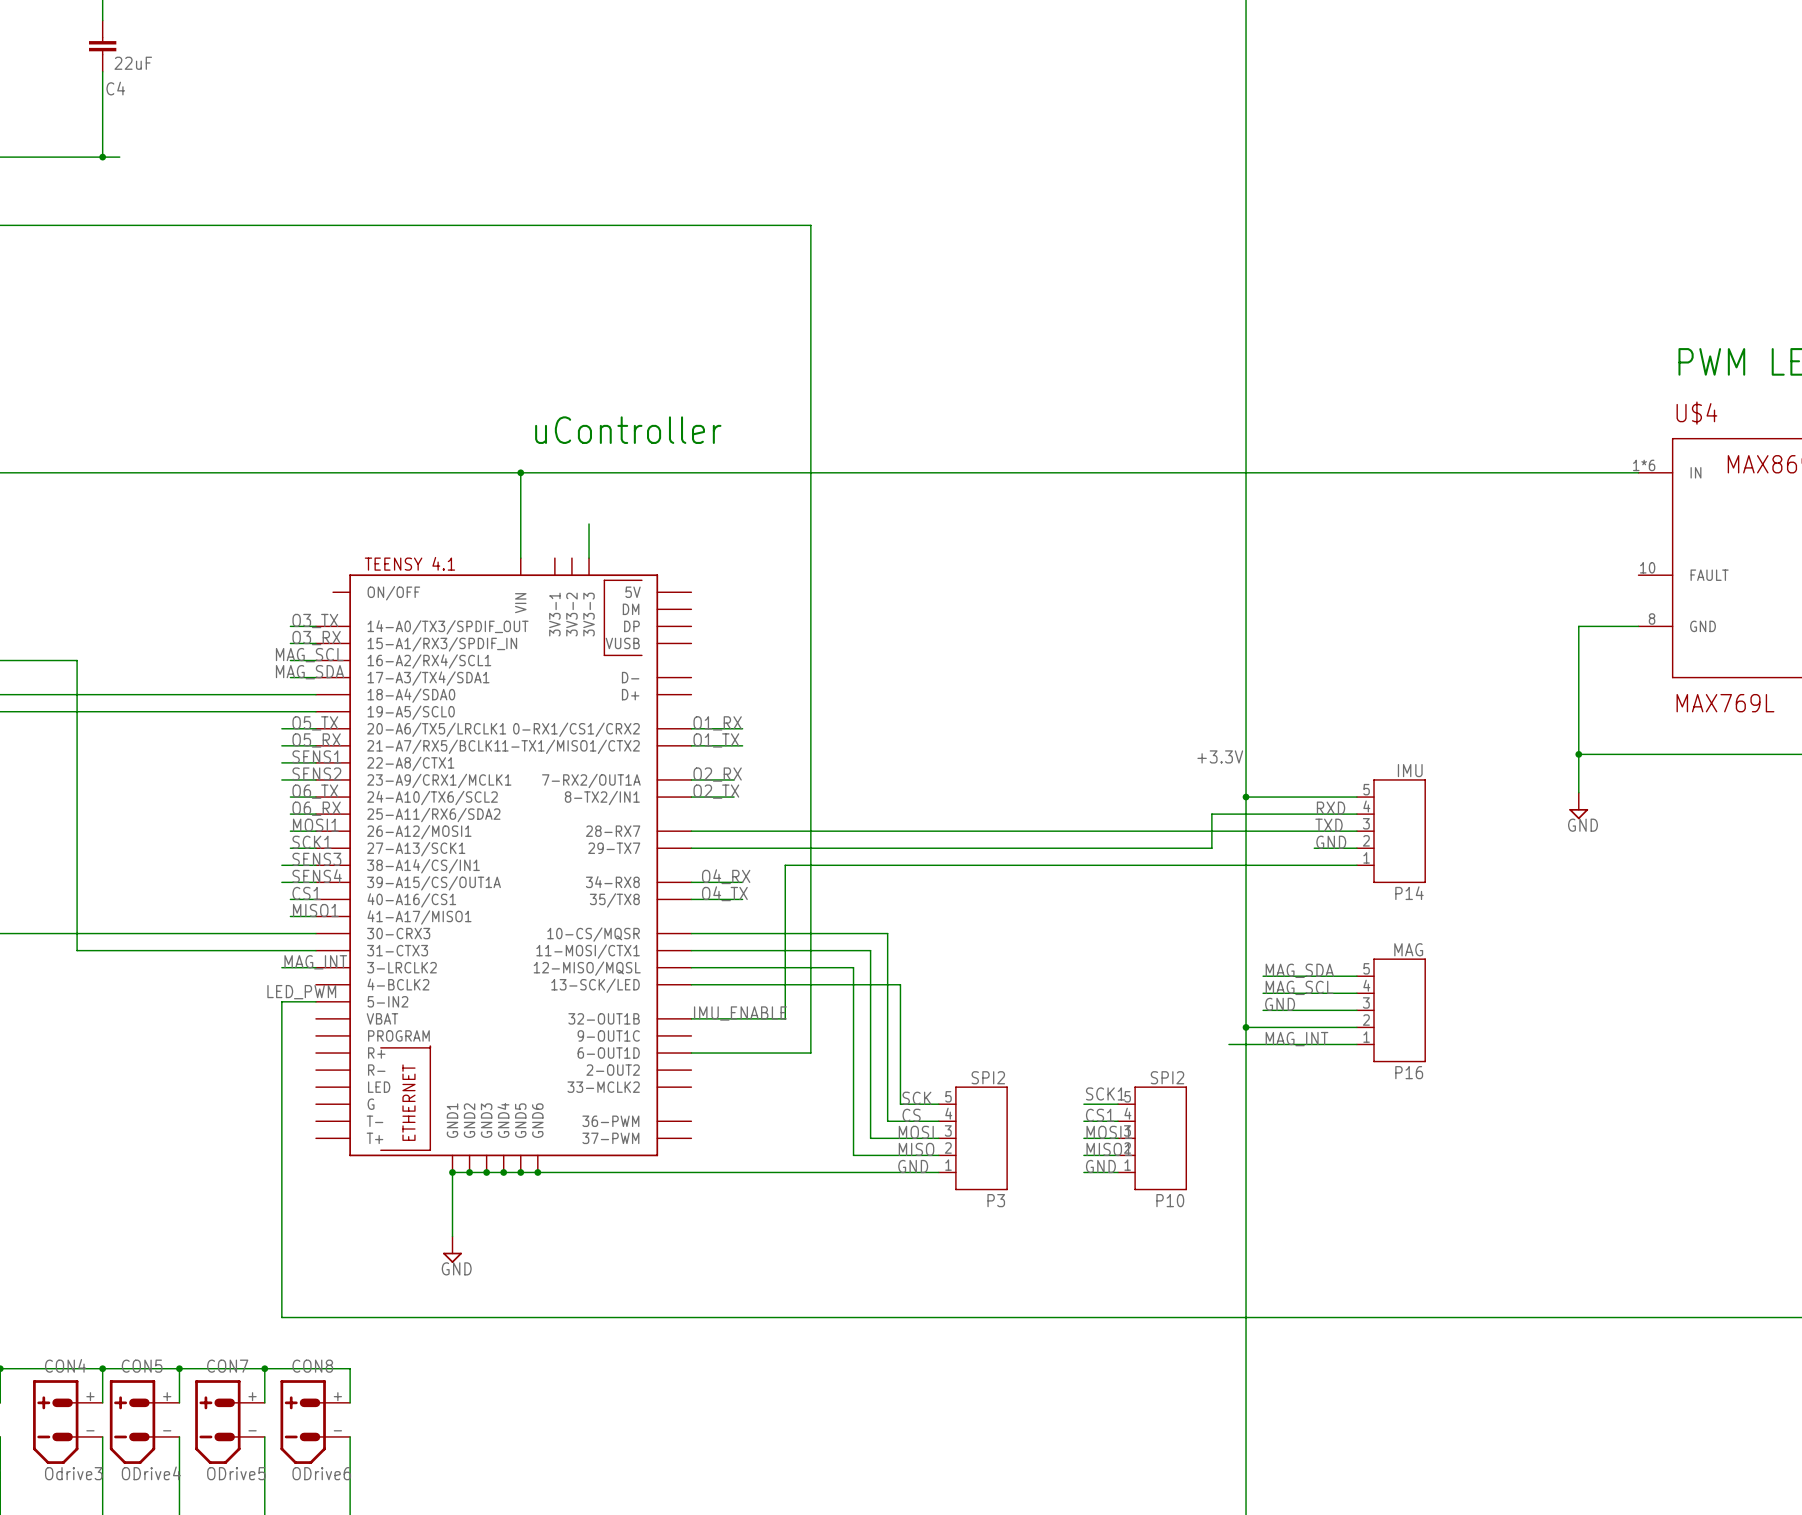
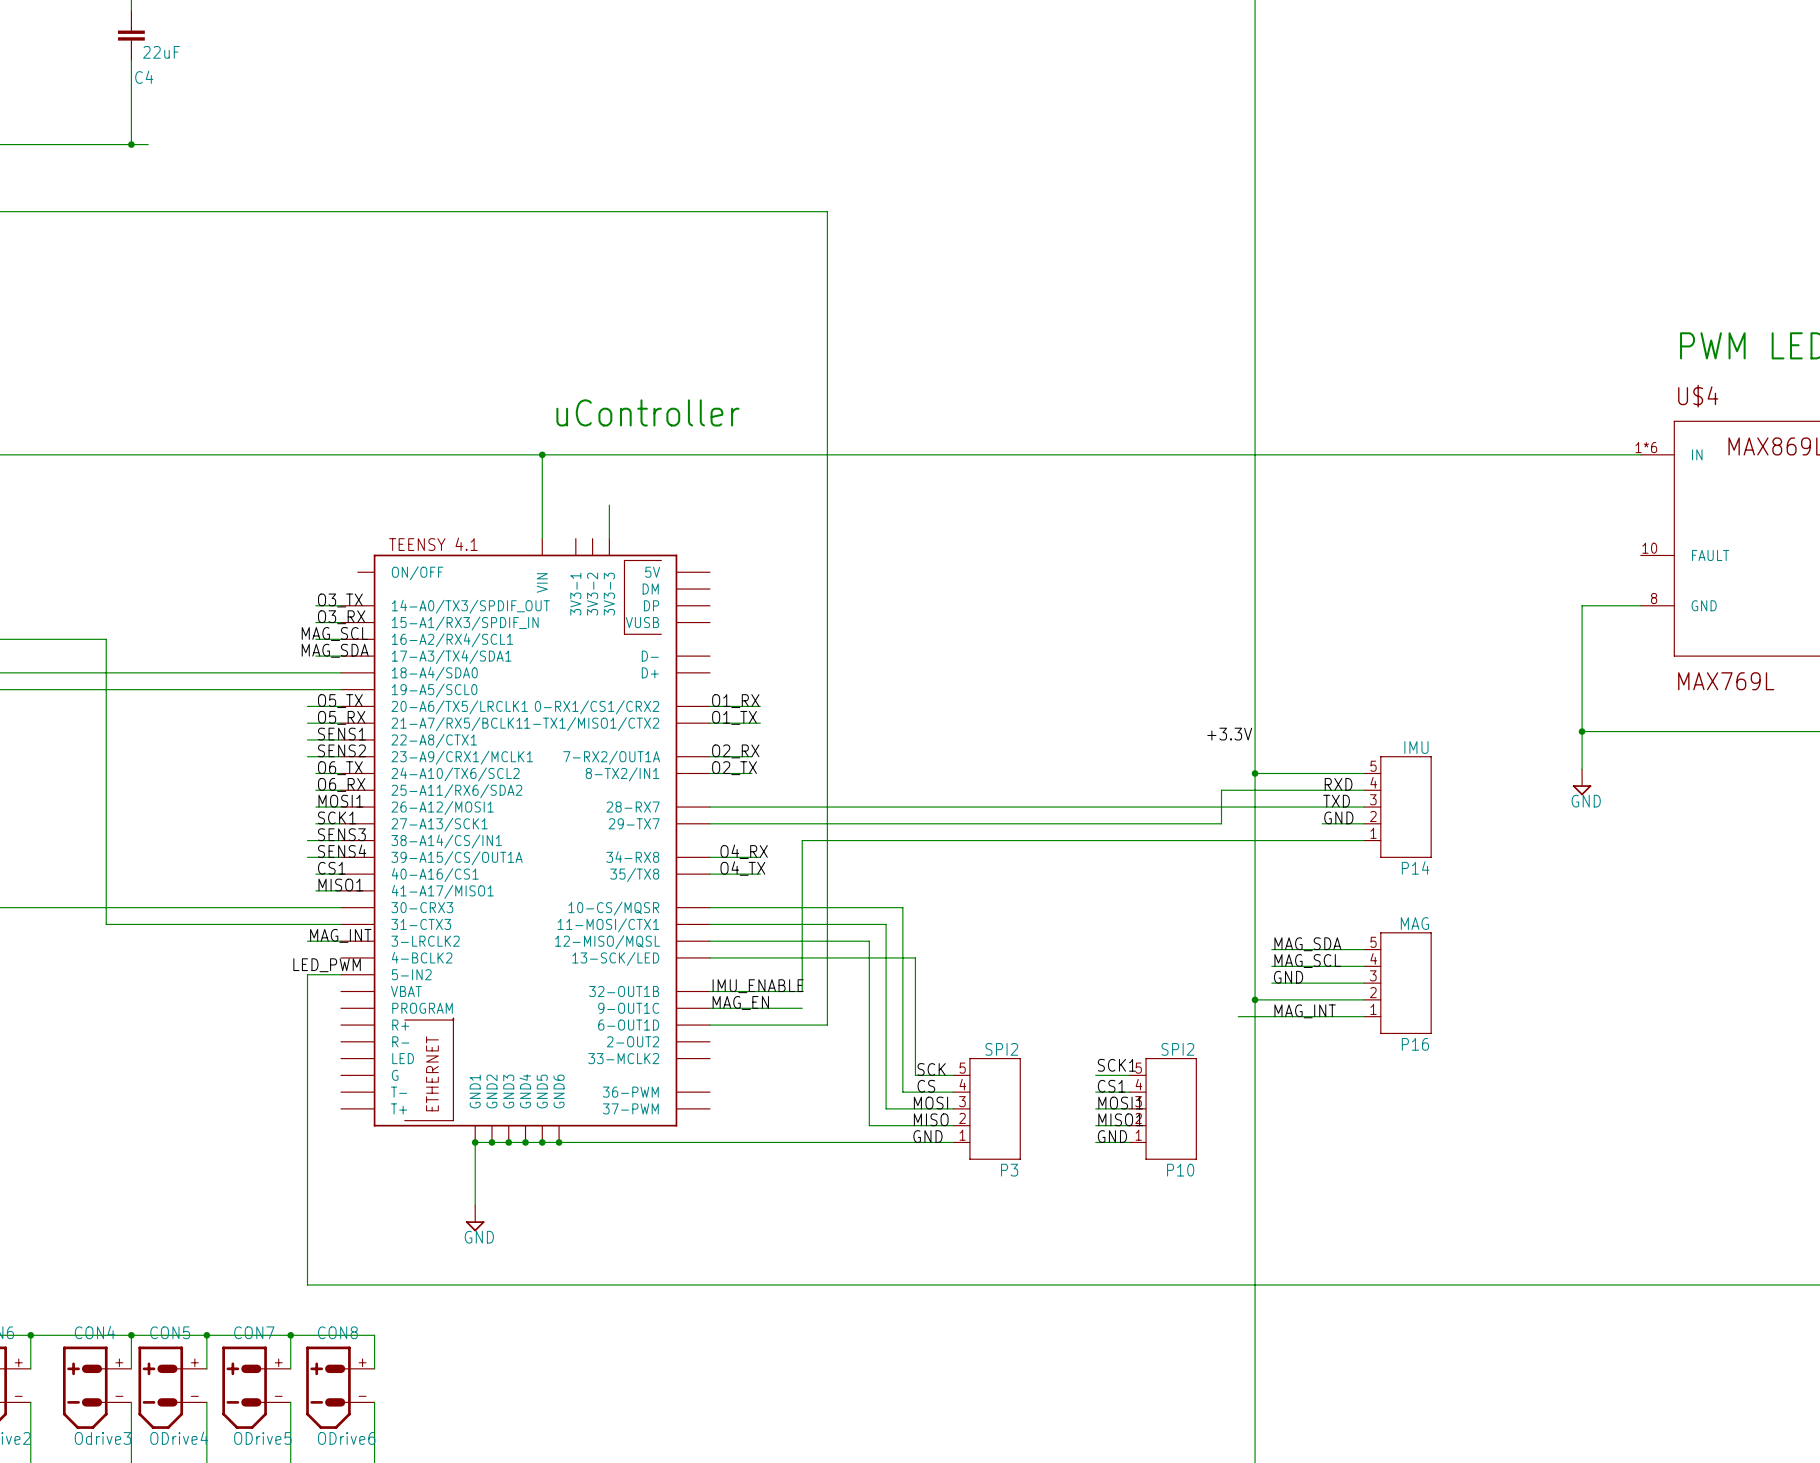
label: none -> MAG_EN (740, 1002)
wire: none -> (709, 1008) (802, 1008)

